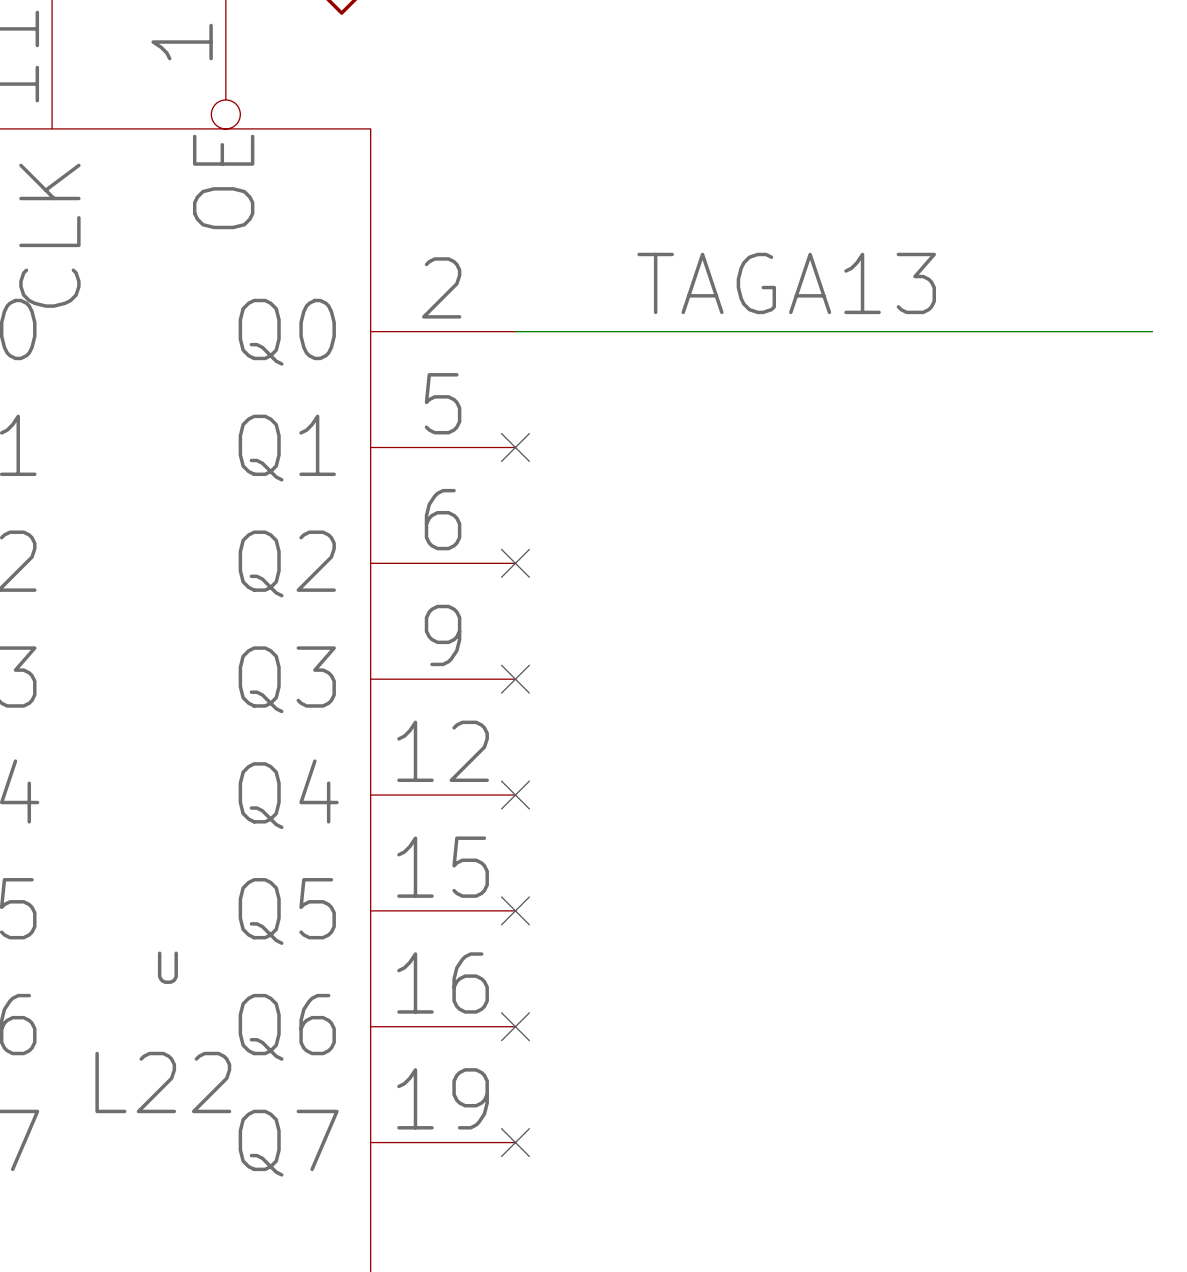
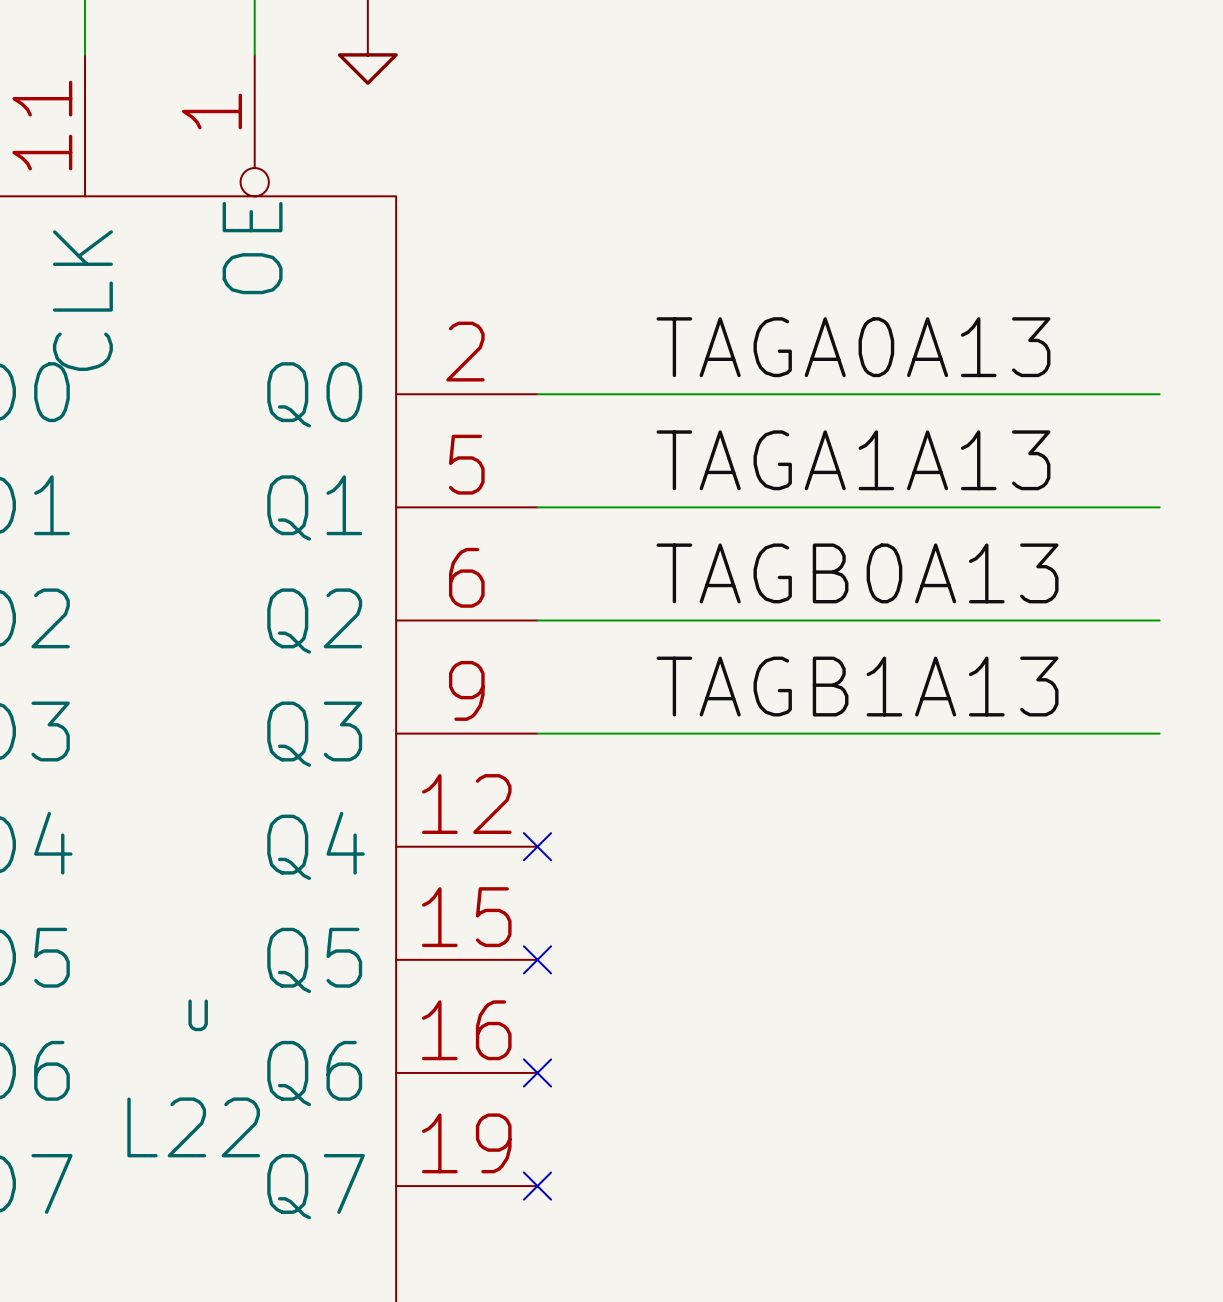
label: TAGA13 (786, 283) -> TAGA0A13 (853, 347)
label: none -> TAGA1A13 (853, 460)
wire: none -> (537, 507) (1159, 507)
no-connect mark: (515, 447) -> none
label: none -> TAGB0A13 (857, 573)
wire: none -> (537, 620) (1159, 620)
no-connect mark: (515, 563) -> none
label: none -> TAGB1A13 (857, 686)
wire: none -> (537, 733) (1159, 733)
no-connect mark: (515, 679) -> none

